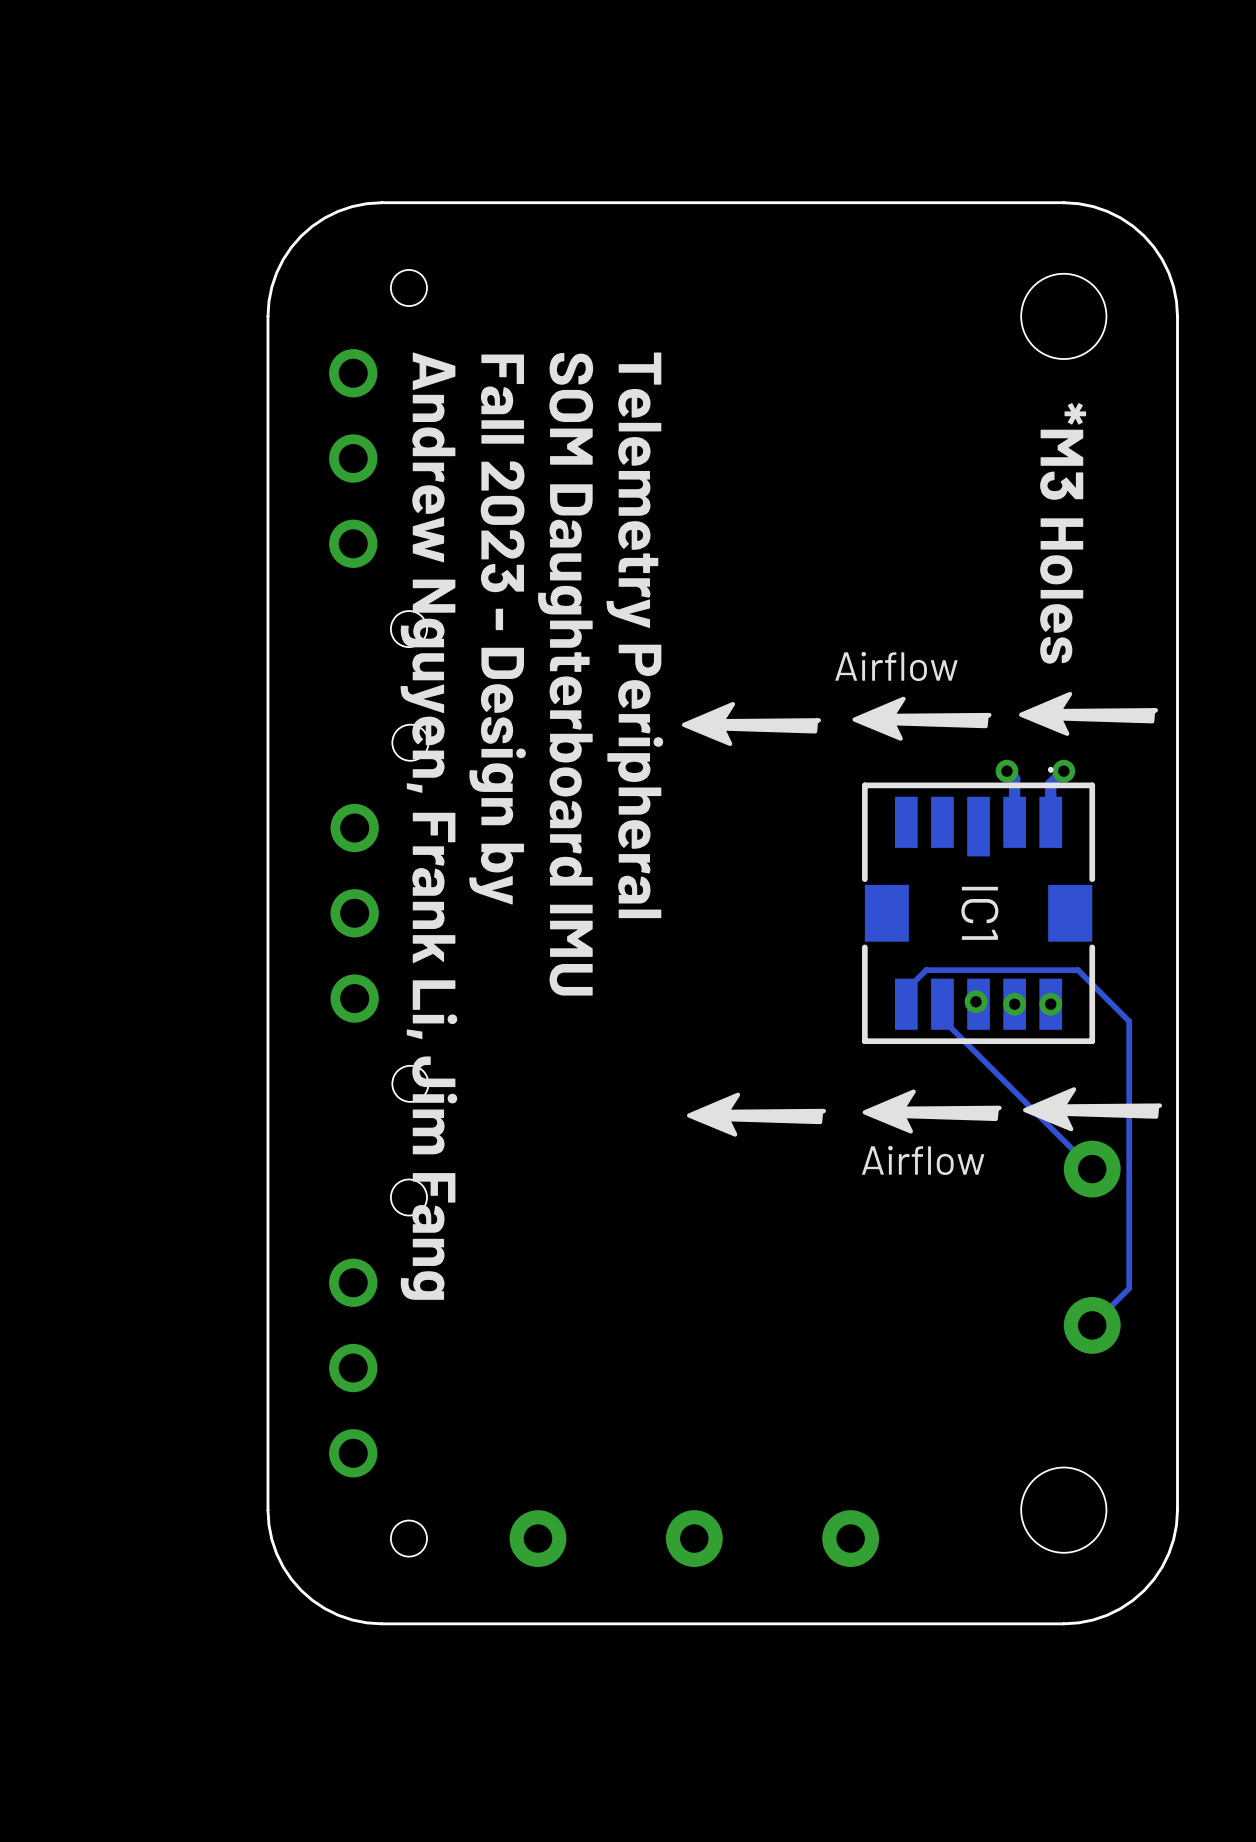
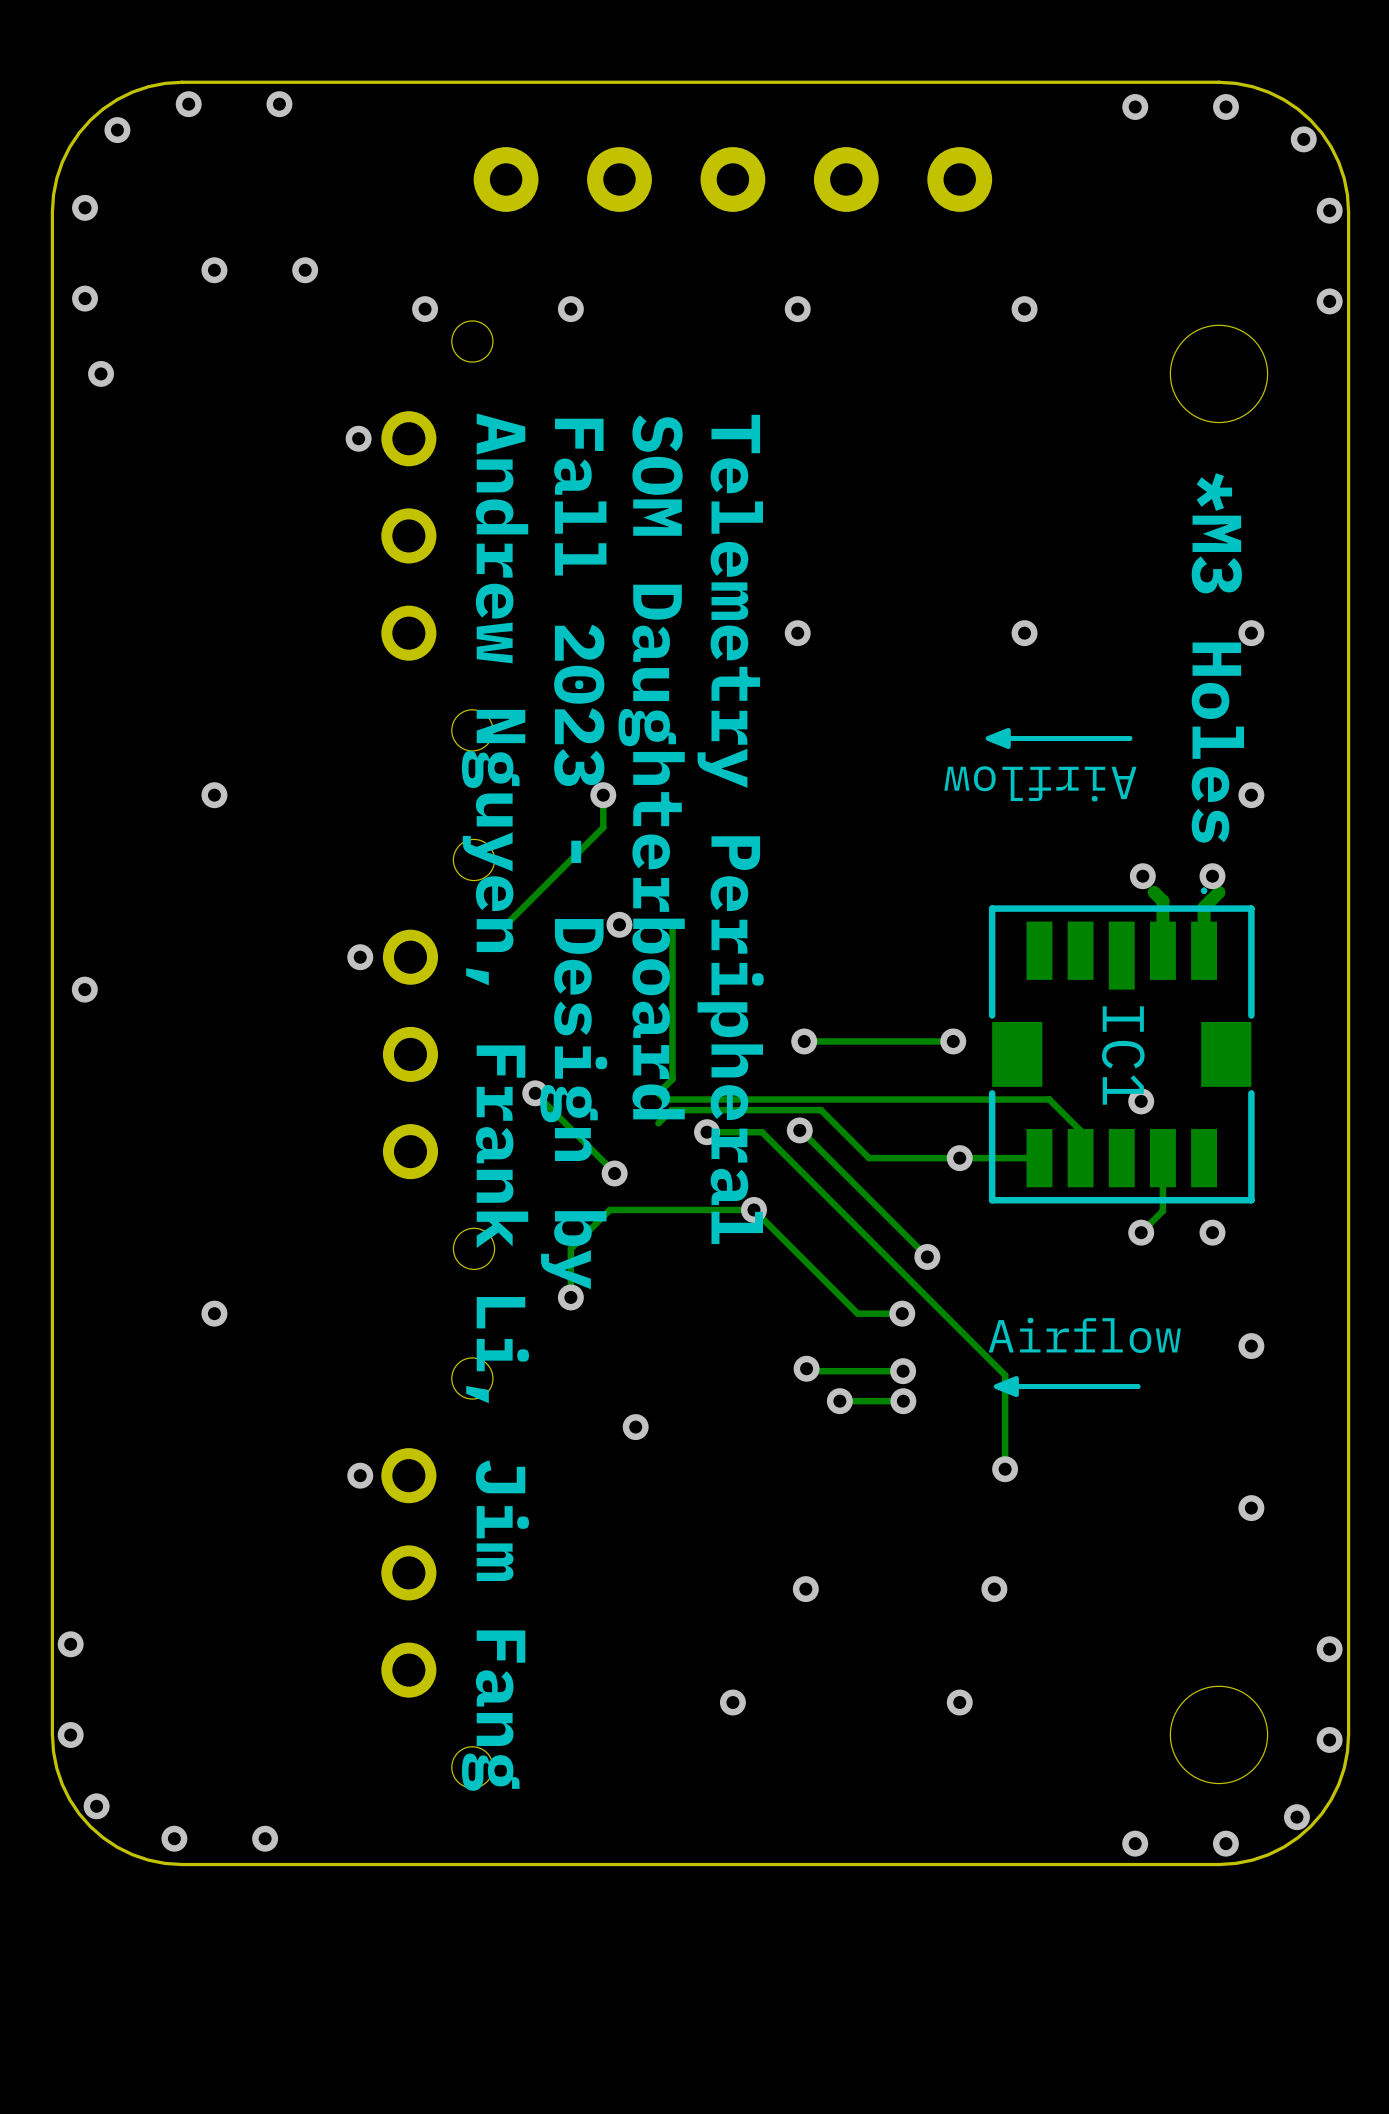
via: none -> (188, 104)
via: none -> (279, 104)
via: none -> (1135, 106)
via: none -> (1225, 106)
via: none -> (117, 130)
via: none -> (1303, 139)
part: none -> (506, 179)
part: none -> (619, 179)
part: none -> (732, 179)
part: none -> (846, 179)
part: none -> (959, 179)
via: none -> (85, 207)
via: none -> (1329, 210)
via: none -> (214, 270)
via: none -> (305, 270)
via: none -> (85, 298)
via: none -> (1329, 301)
via: none -> (425, 309)
via: none -> (570, 309)
via: none -> (797, 309)
via: none -> (1024, 309)
via: none -> (101, 373)
board edge: (1177, 316) (1173, 286) (1168, 272) (1154, 247) (1144, 236) (1120, 217) (1107, 211) (1078, 203) (1063, 202) (366, 203) (352, 206) (324, 217) (301, 236) (283, 259) (271, 286) (267, 316) (268, 1524) (271, 1539) (283, 1567) (301, 1590) (312, 1600) (338, 1615) (352, 1619) (381, 1623) -> (1348, 373) (1348, 211) (1347, 194) (1338, 162) (1321, 132) (1297, 109) (1268, 92) (1235, 83) (182, 82) (148, 86) (117, 99) (90, 120) (69, 147) (56, 178) (52, 211) (52, 1734) (56, 1768) (69, 1799) (90, 1826) (117, 1847) (148, 1860) (182, 1864) (441, 1864)
via: none -> (358, 438)
via: none -> (797, 633)
via: none -> (1024, 633)
via: none -> (1251, 633)
drawing: none -> [985, 727, 1133, 750]
text rotation: 0° (896, 666) -> 180° (1040, 783)
text: SOM Daughterboard IMU (565, 674) -> SOM Daughterboard (651, 767)
via: none -> (214, 795)
track: none -> (603, 795) (603, 827) (506, 924)
via: none -> (603, 795)
via: none -> (1251, 795)
drawing: [681, 691, 1159, 747] -> none
via position: (1006, 771) -> (1142, 876)
via position: (1063, 771) -> (1212, 876)
via: none -> (619, 924)
via: none -> (360, 957)
via: none -> (84, 989)
via: none -> (804, 1041)
track: none -> (953, 1041) (804, 1041)
via: none -> (953, 1041)
track: none -> (535, 1093) (614, 1173)
via: none -> (535, 1093)
via: none -> (1141, 1101)
track: none -> (799, 1130) (927, 1256)
via: none -> (799, 1130)
via: none -> (706, 1132)
track: none -> (706, 1134) (706, 1132) (762, 1132) (1005, 1375) (1005, 1469)
via: (975, 1001) -> none
via: none -> (959, 1158)
track: (906, 1004) (906, 990) (926, 970) (1078, 970) (1129, 1021) (1129, 1288) (1092, 1325) -> (1039, 1158) (869, 1158) (821, 1110) (671, 1110) (658, 1123)
track: (942, 1004) (942, 1019) (1092, 1169) -> (1080, 1158) (1080, 1130) (1049, 1099) (664, 1099) (658, 1093) (672, 1079) (672, 929)
track: none -> (1162, 1158) (1162, 1210) (1141, 1232)
via: (1014, 1004) -> none
via: (1050, 1004) -> none
via: none -> (614, 1173)
via: none -> (753, 1209)
via: none -> (1141, 1232)
via: none -> (1212, 1232)
drawing: [862, 1087, 1163, 1134] -> none
via: none -> (927, 1256)
drawing: [686, 1092, 826, 1137] -> none
track: none -> (570, 1297) (570, 1248) (609, 1209) (753, 1209) (857, 1313) (902, 1313)
via: none -> (570, 1297)
via: none -> (214, 1313)
via: none -> (902, 1313)
part: (1092, 1169) -> none
via: none -> (1251, 1346)
track: none -> (806, 1368) (809, 1371) (903, 1371)
via: none -> (806, 1368)
via: none -> (903, 1371)
drawing: none -> [993, 1376, 1141, 1398]
via: none -> (839, 1401)
track: none -> (903, 1401) (839, 1401)
via: none -> (903, 1401)
via: none -> (635, 1427)
via: none -> (1005, 1469)
via: none -> (360, 1475)
via: none -> (1251, 1508)
part: (1092, 1325) -> none
via: none -> (805, 1589)
via: none -> (994, 1589)
via: none -> (70, 1644)
via: none -> (1329, 1649)
via: none -> (732, 1702)
via: none -> (959, 1702)
via: none -> (70, 1735)
via: none -> (1329, 1739)
part: (537, 1538) -> none
part: (694, 1538) -> none
part: (850, 1538) -> none
via: none -> (96, 1806)
via: none -> (1296, 1817)
via: none -> (174, 1838)
via: none -> (265, 1838)
via: none -> (1135, 1843)
via: none -> (1225, 1843)

